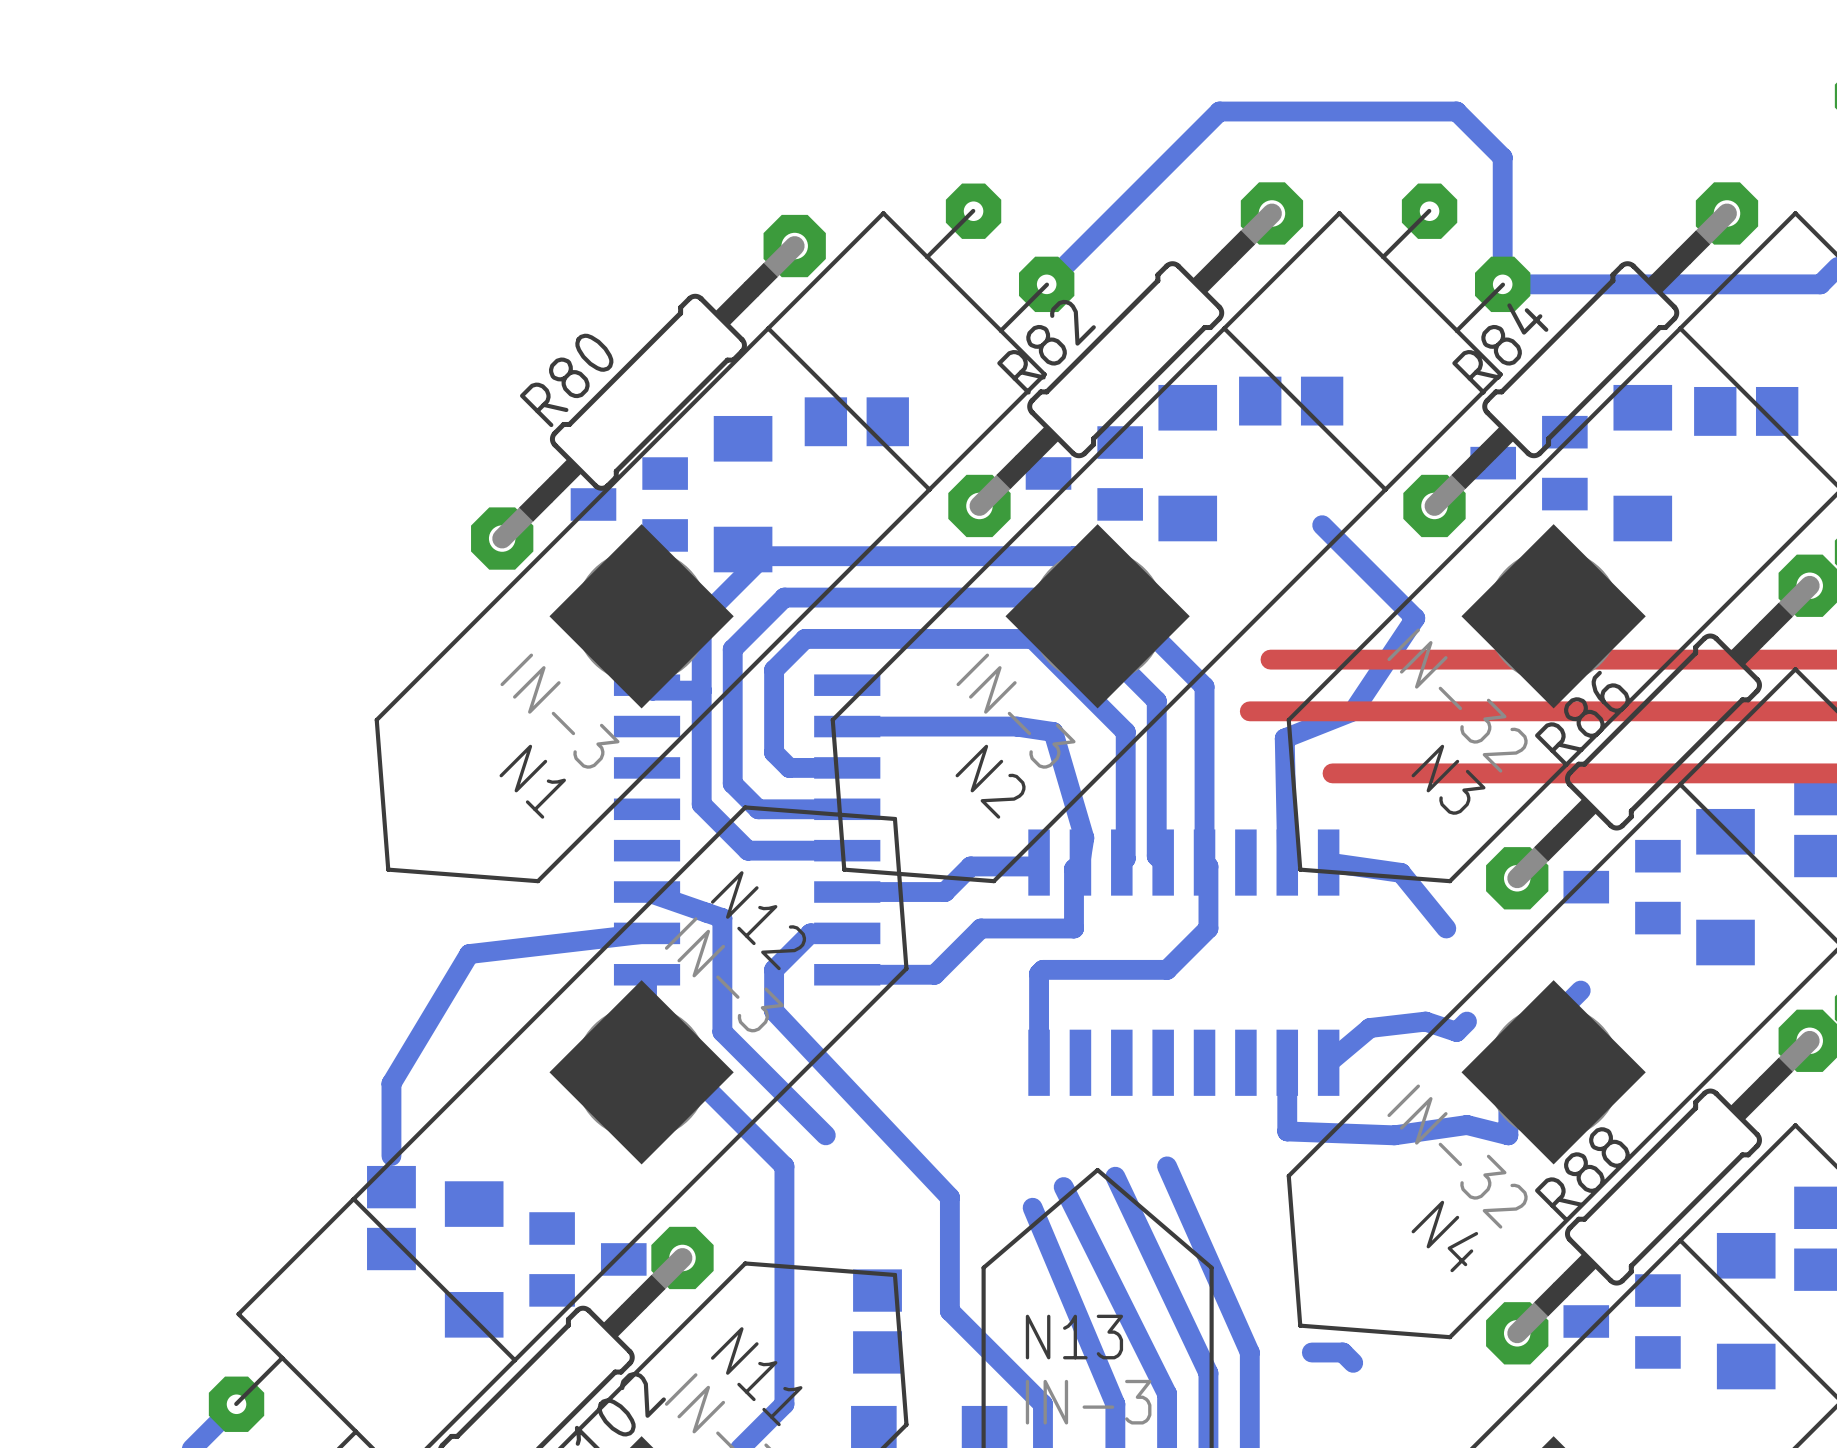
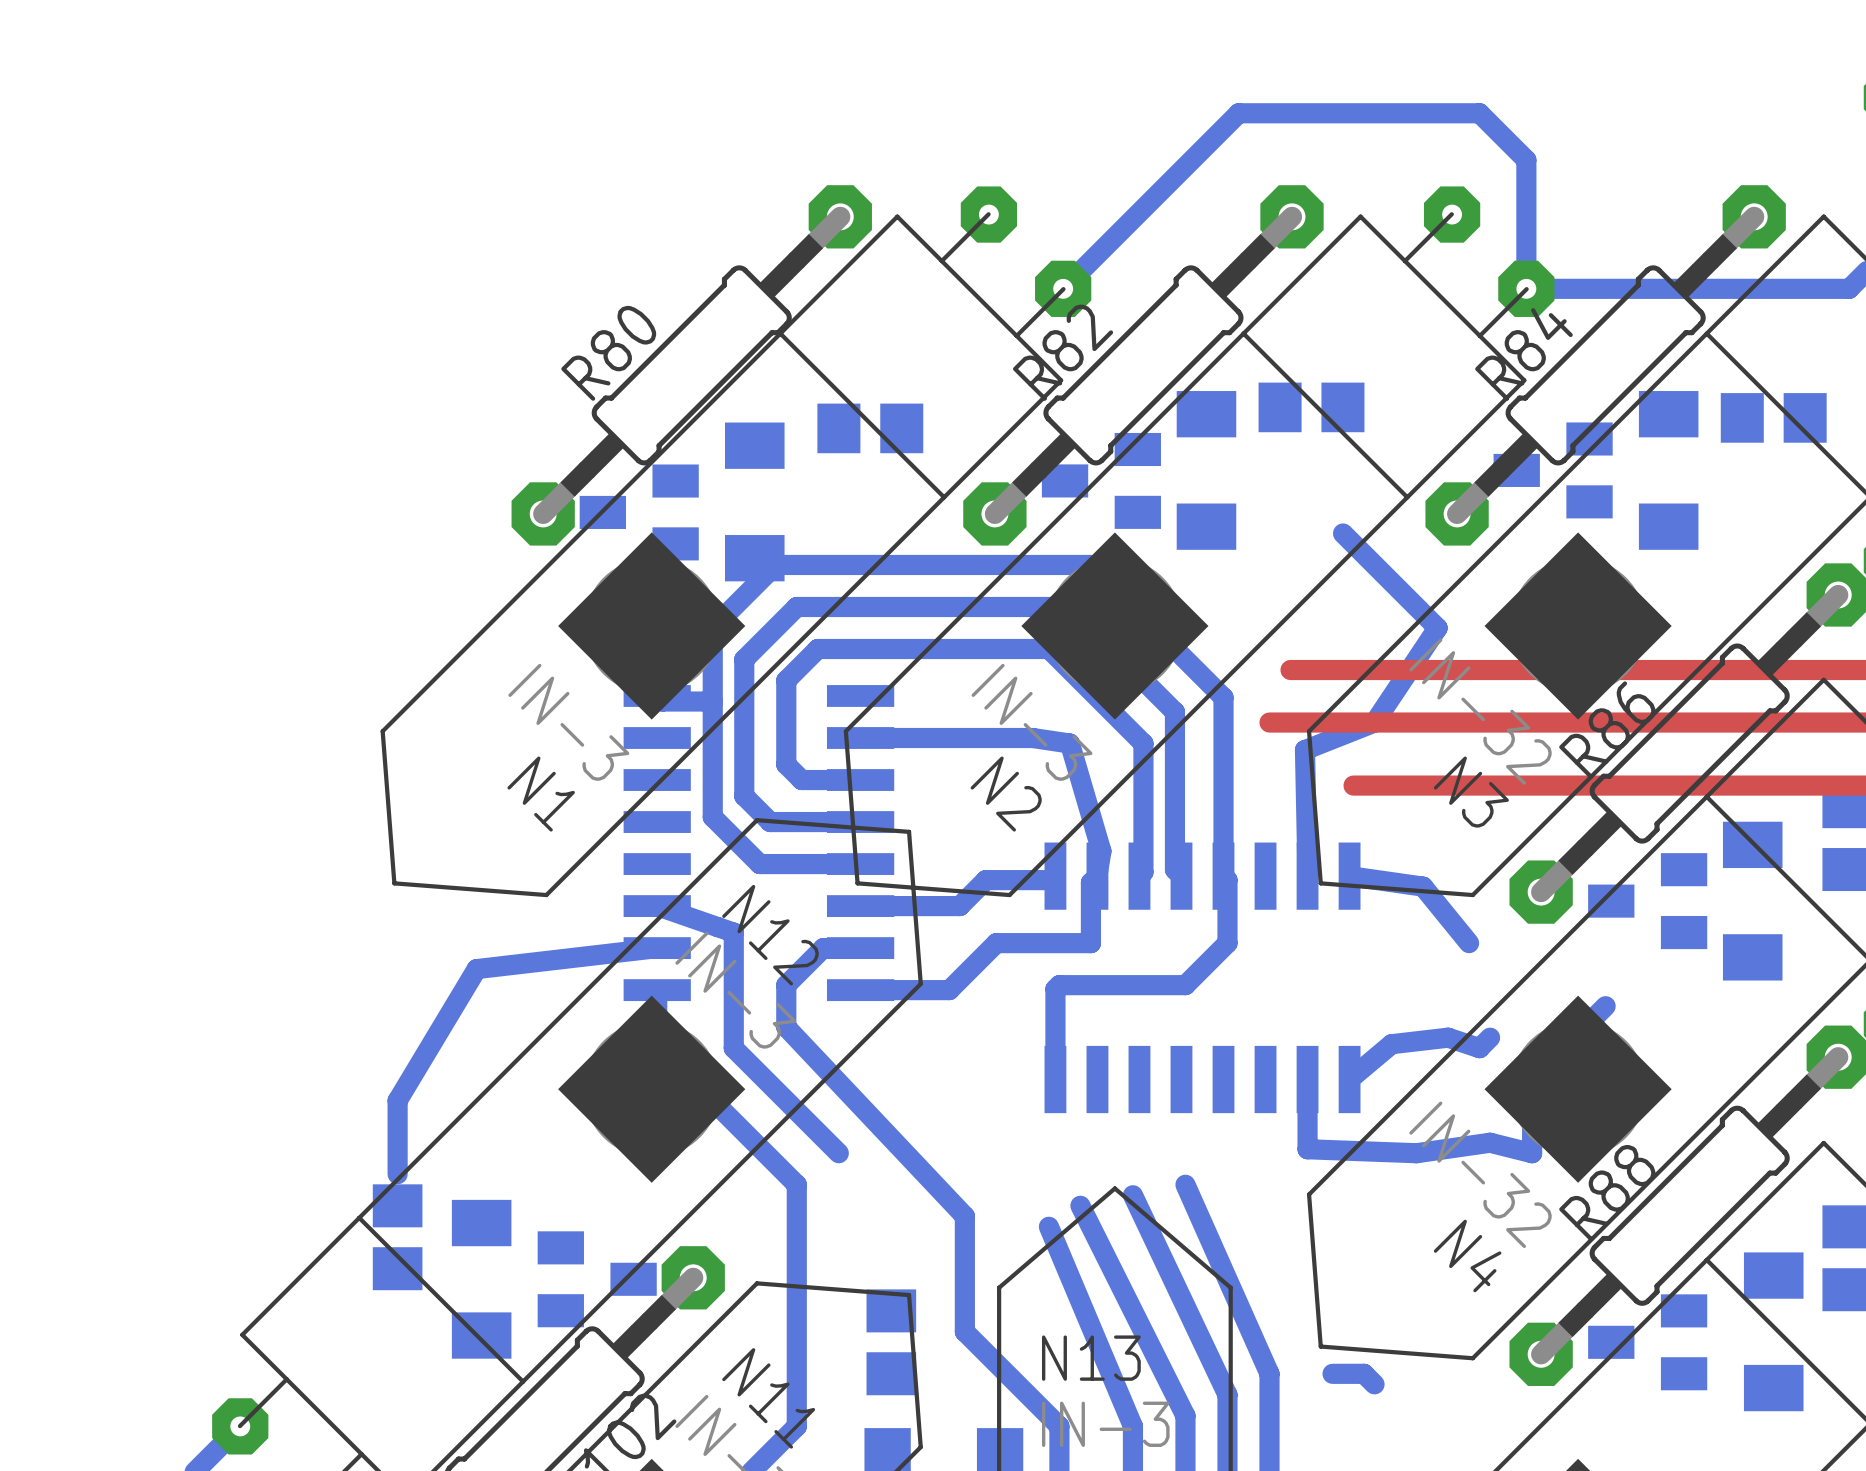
R80 position: (648, 392) -> (691, 365)

